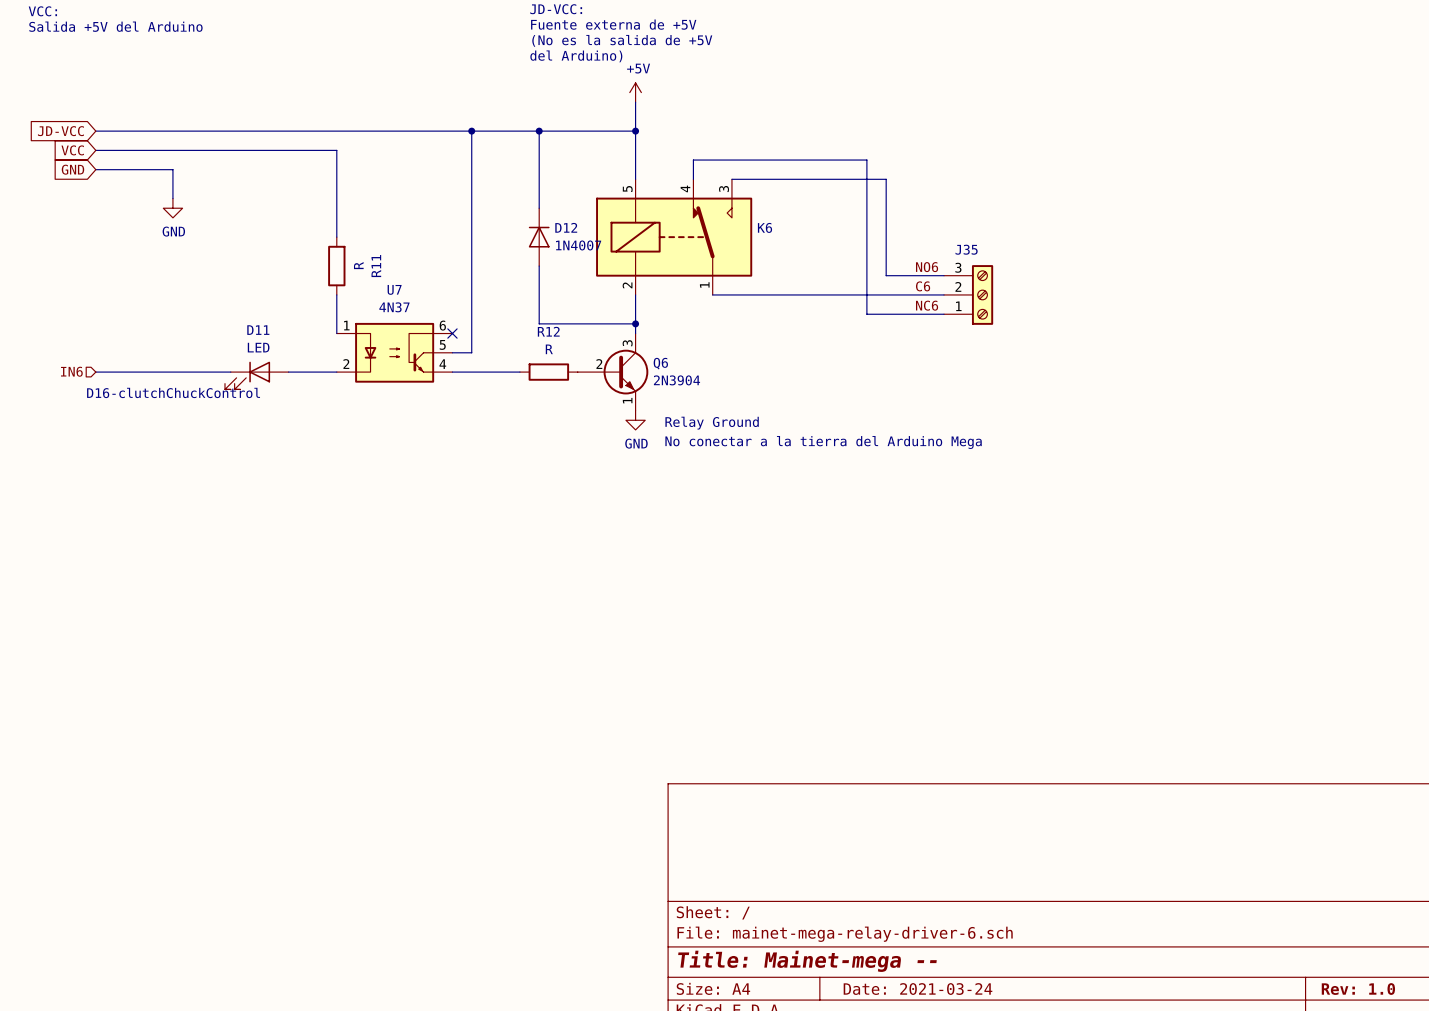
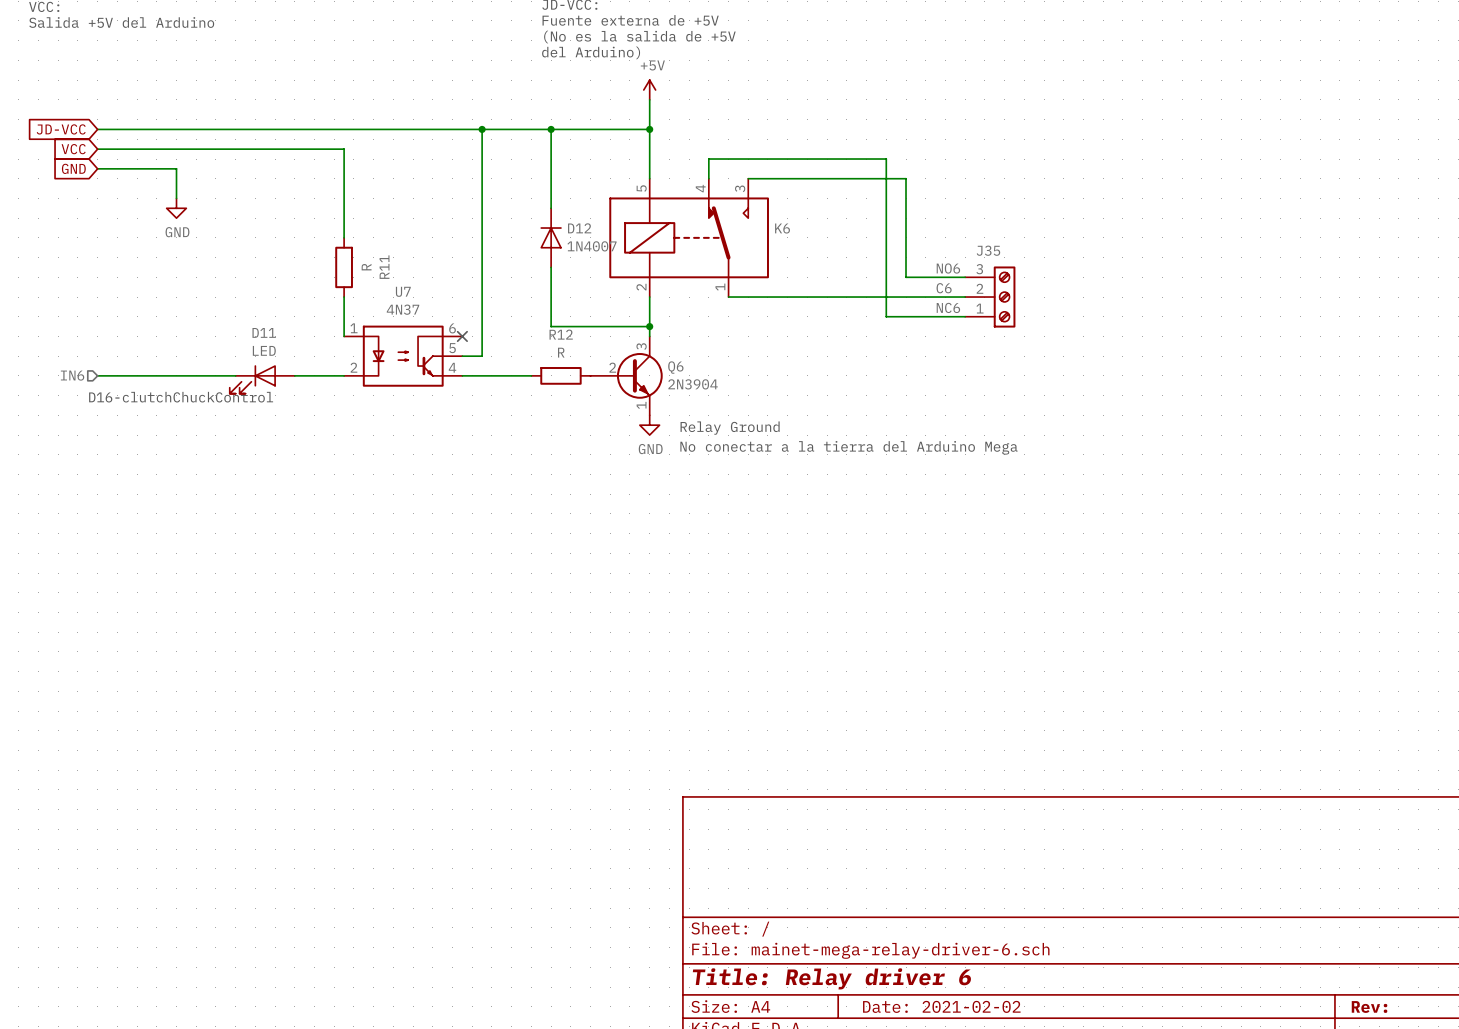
title block: Title: Mainet-mega -- (807, 961) -> Title: Relay driver 6 (831, 978)
title block: Date: 2021-03-24 (917, 989) -> Date: 2021-02-02 (941, 1006)
title block: Rev: 1.0 (1358, 989) -> Rev: (1369, 1006)

